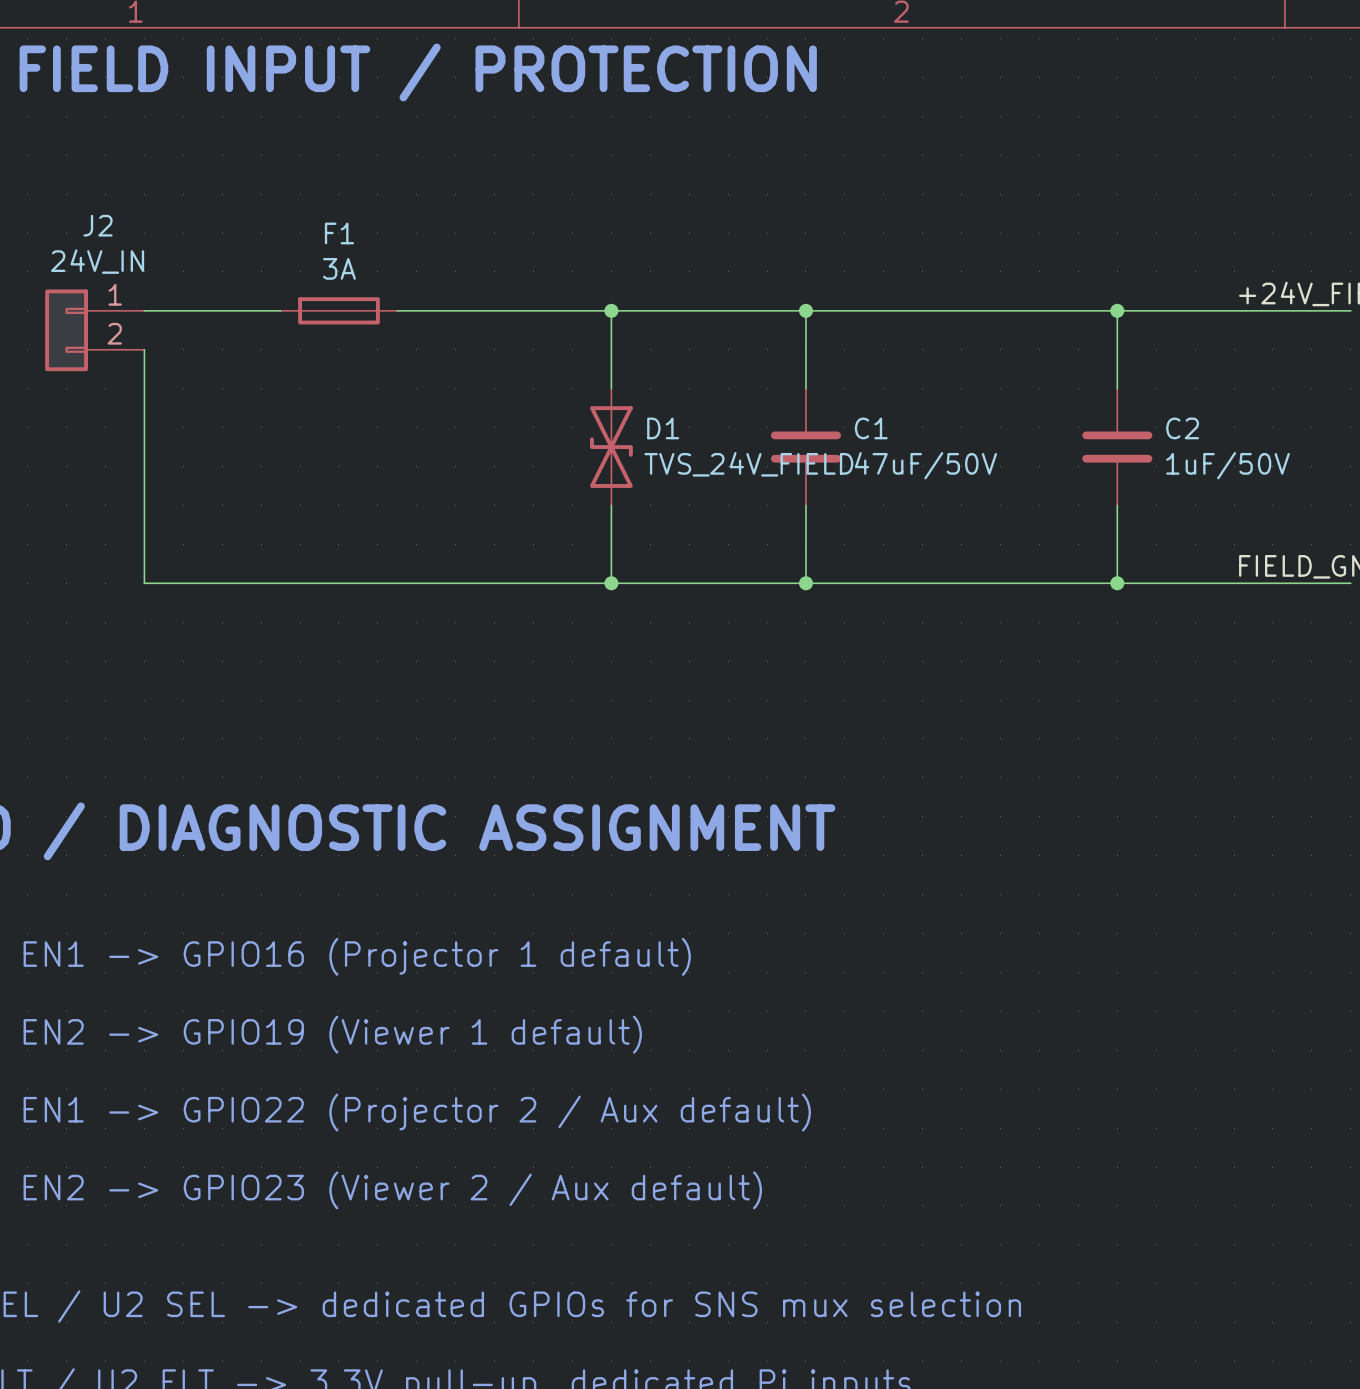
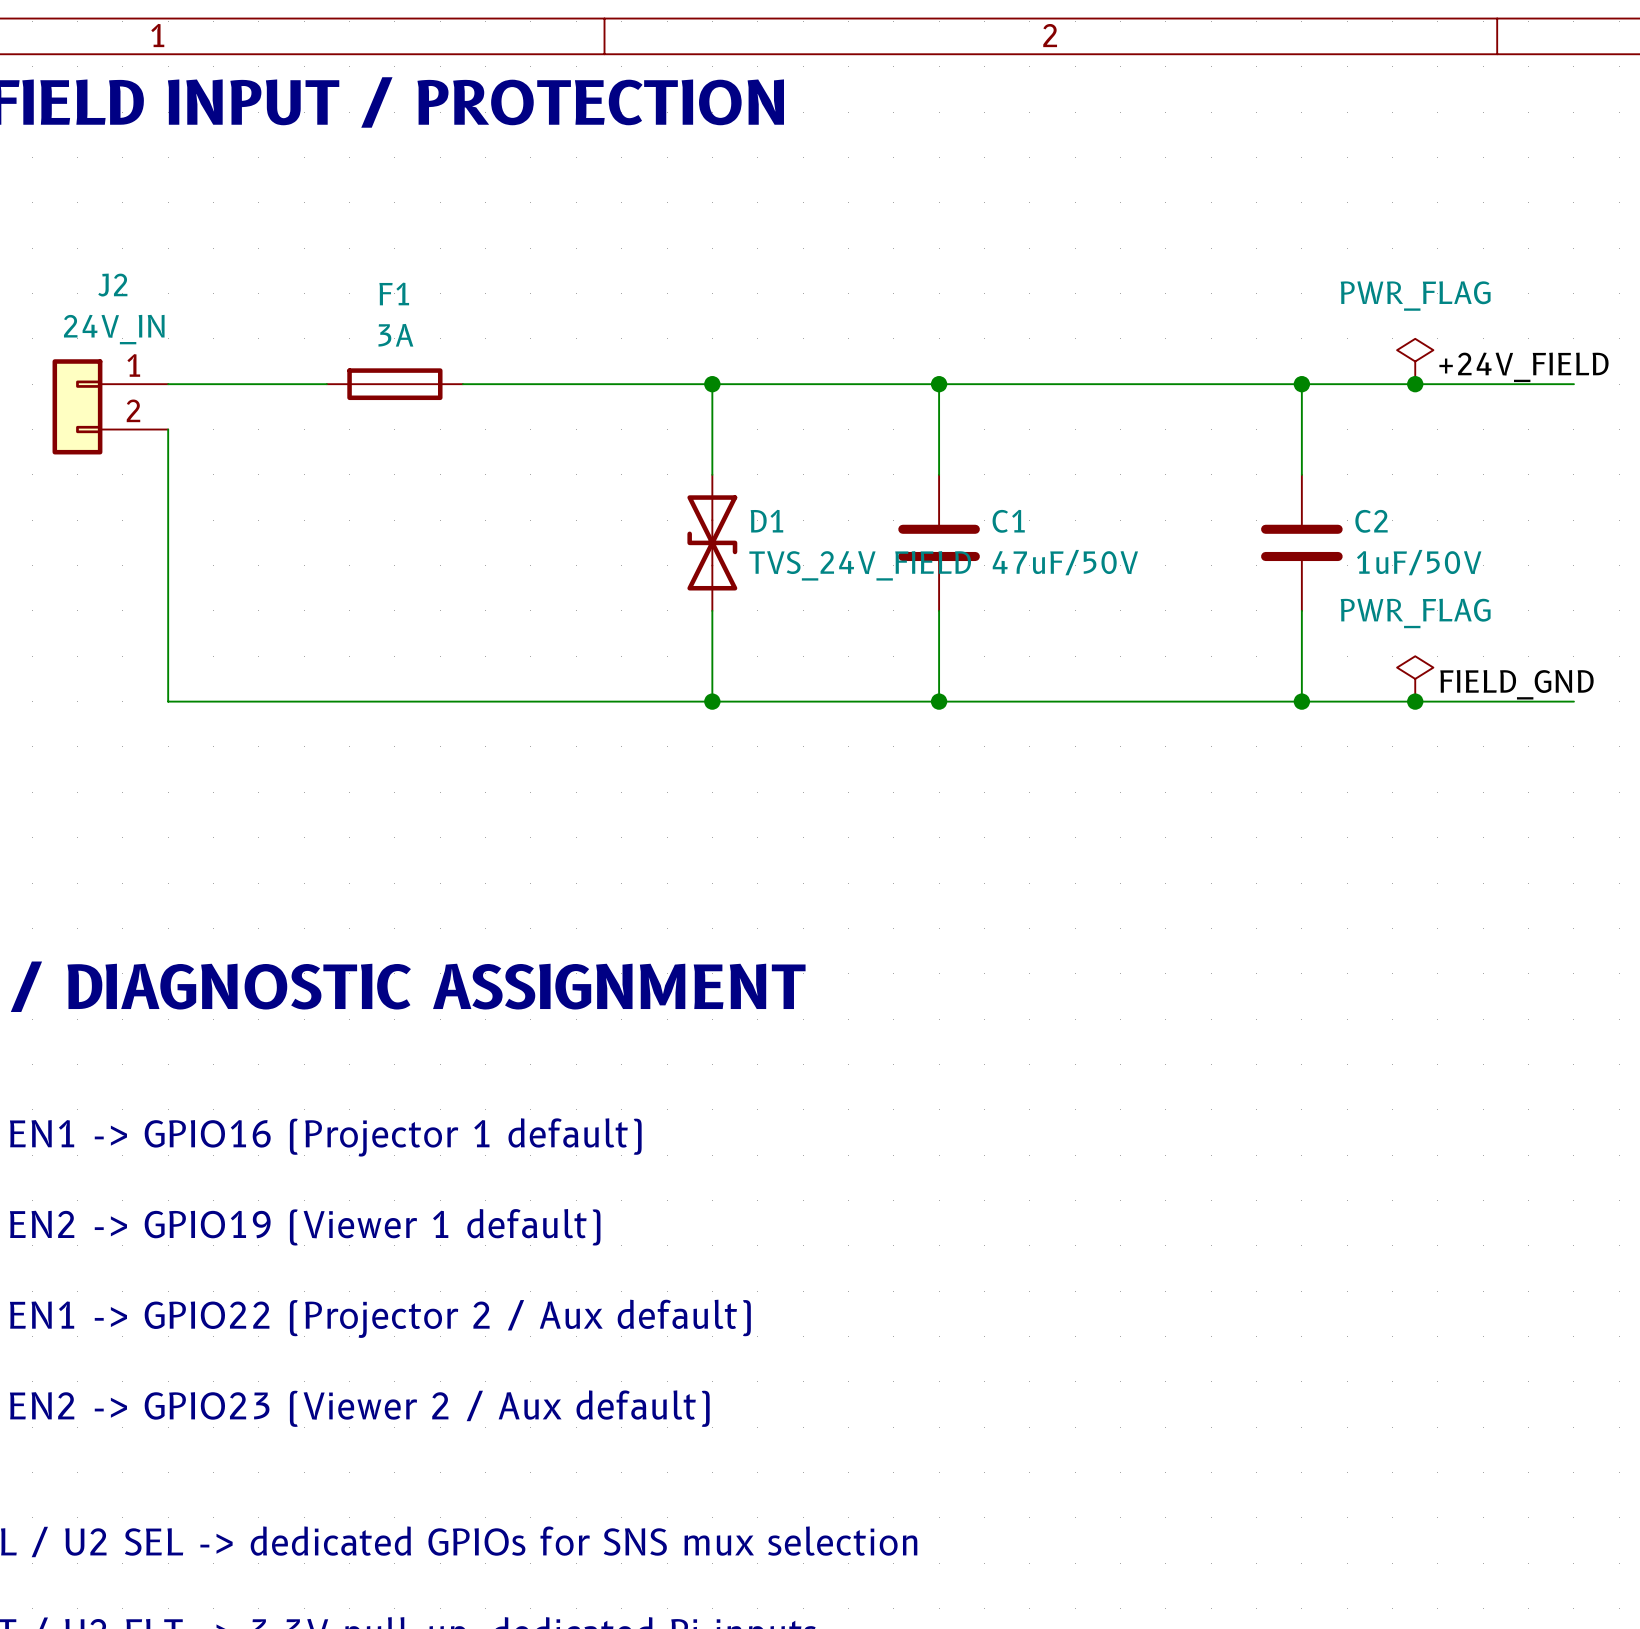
power symbol: none -> PWR_FLAG (1415, 361)
junction: none -> (1415, 384)
power symbol: none -> PWR_FLAG (1415, 678)
junction: none -> (1415, 701)

